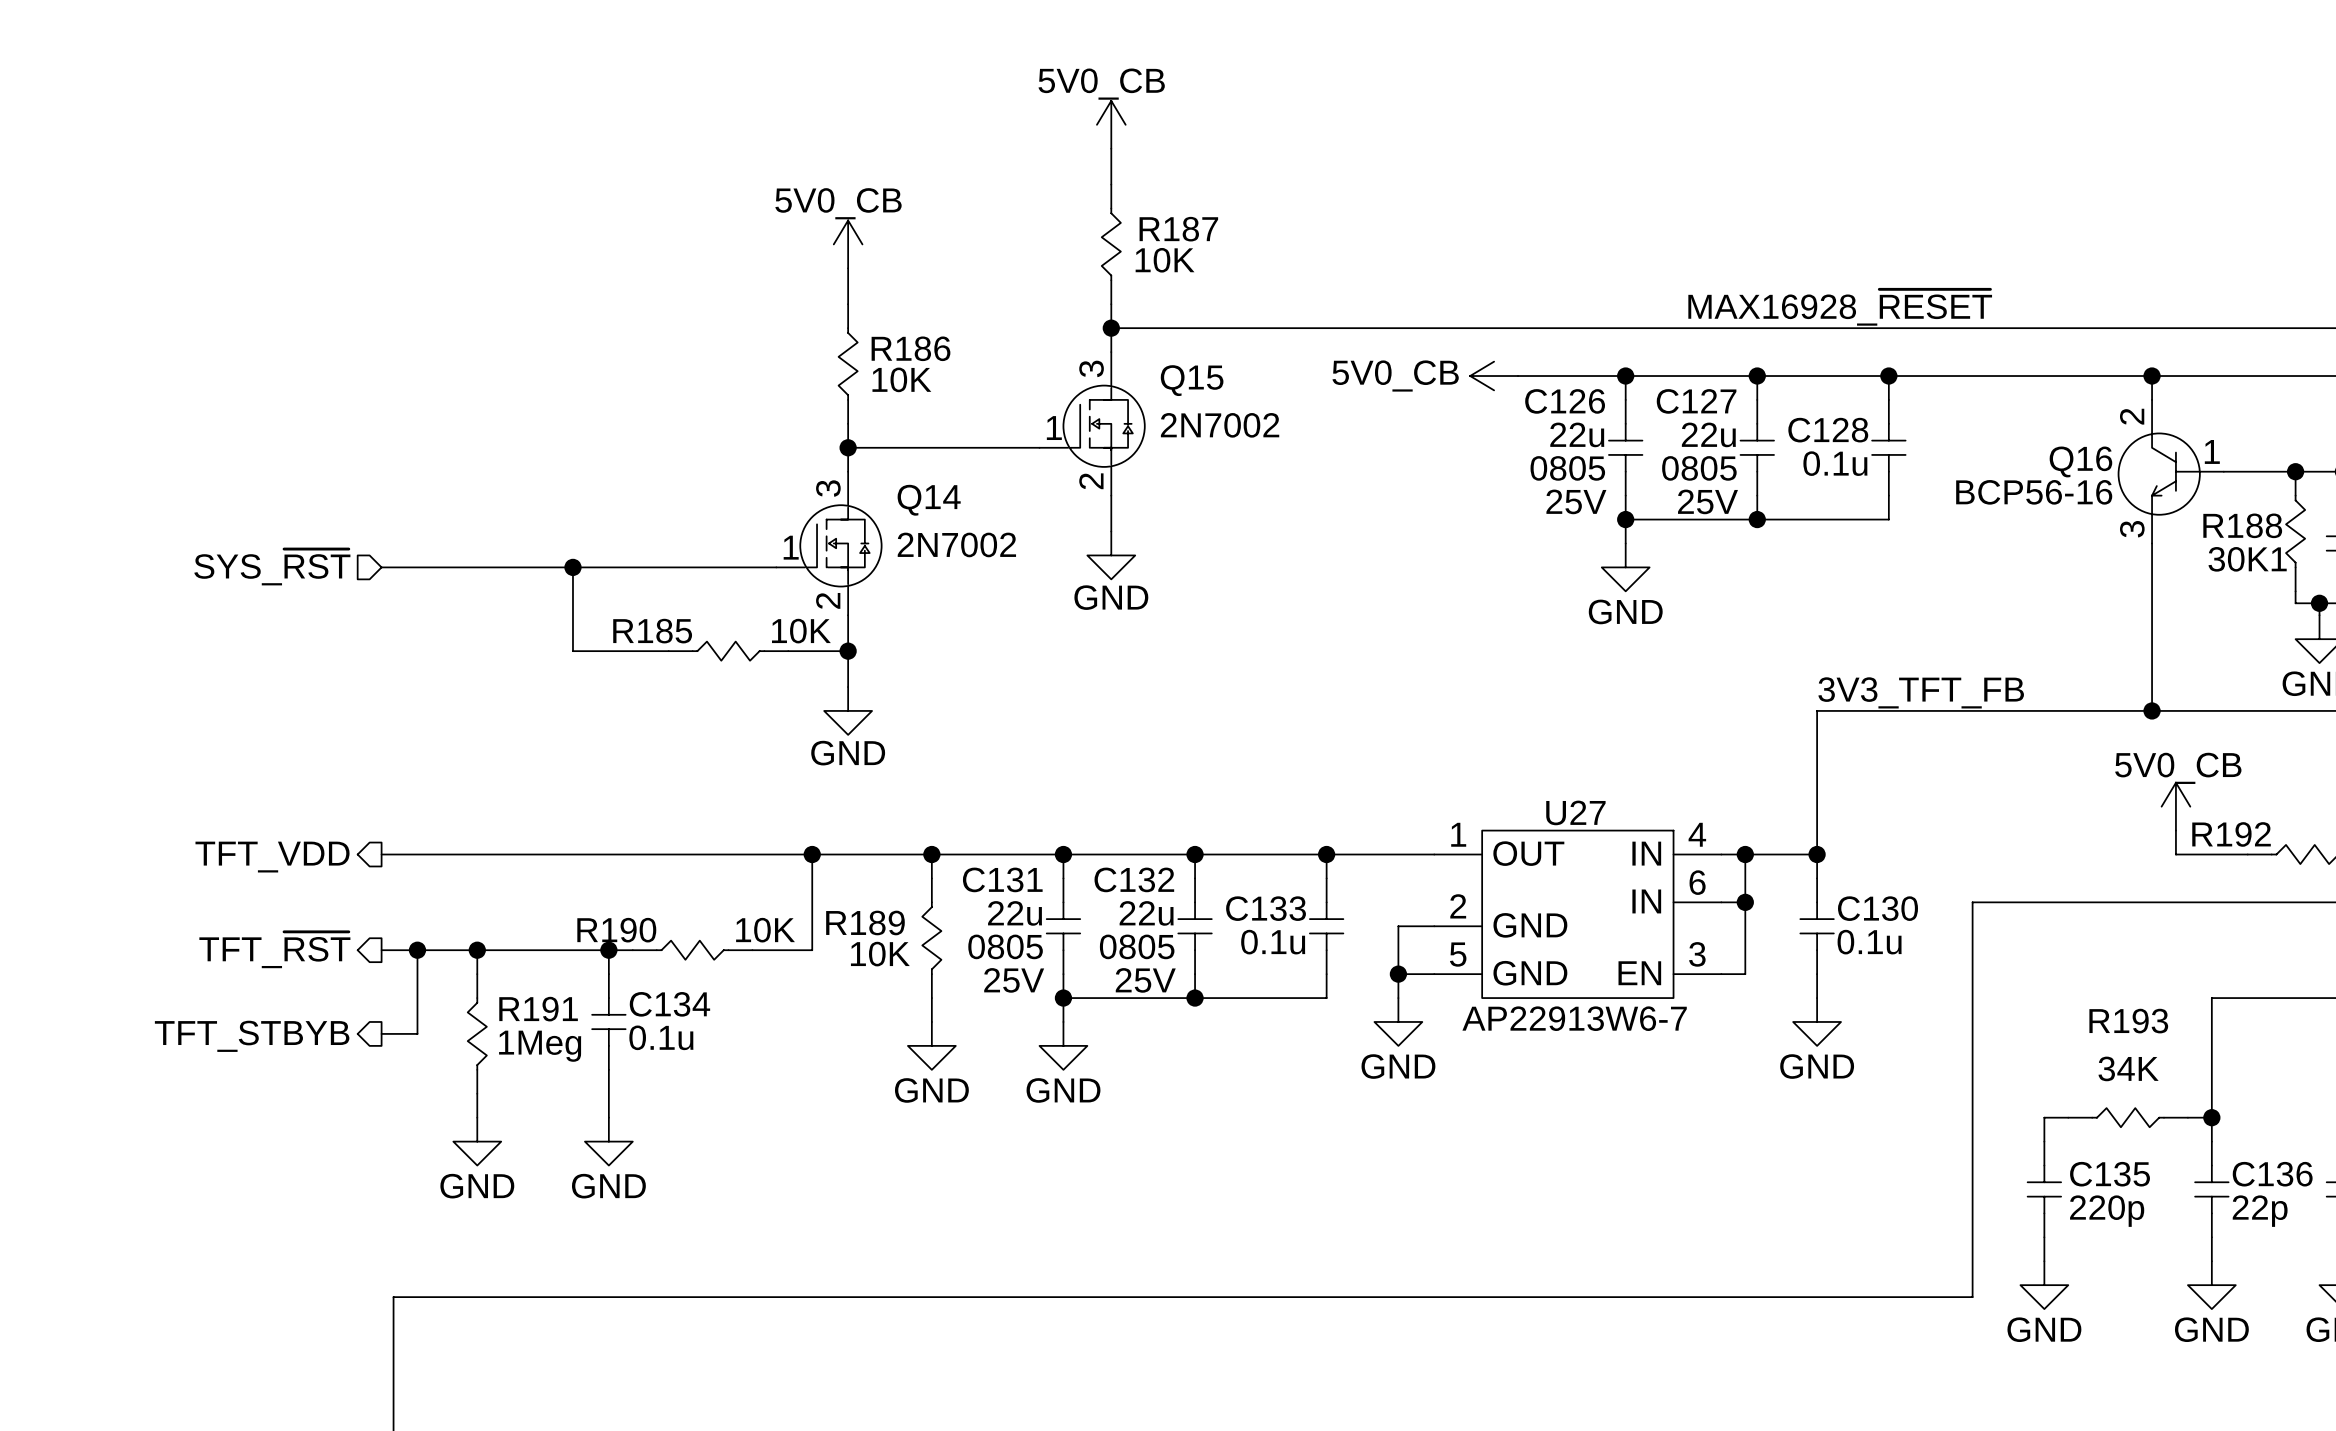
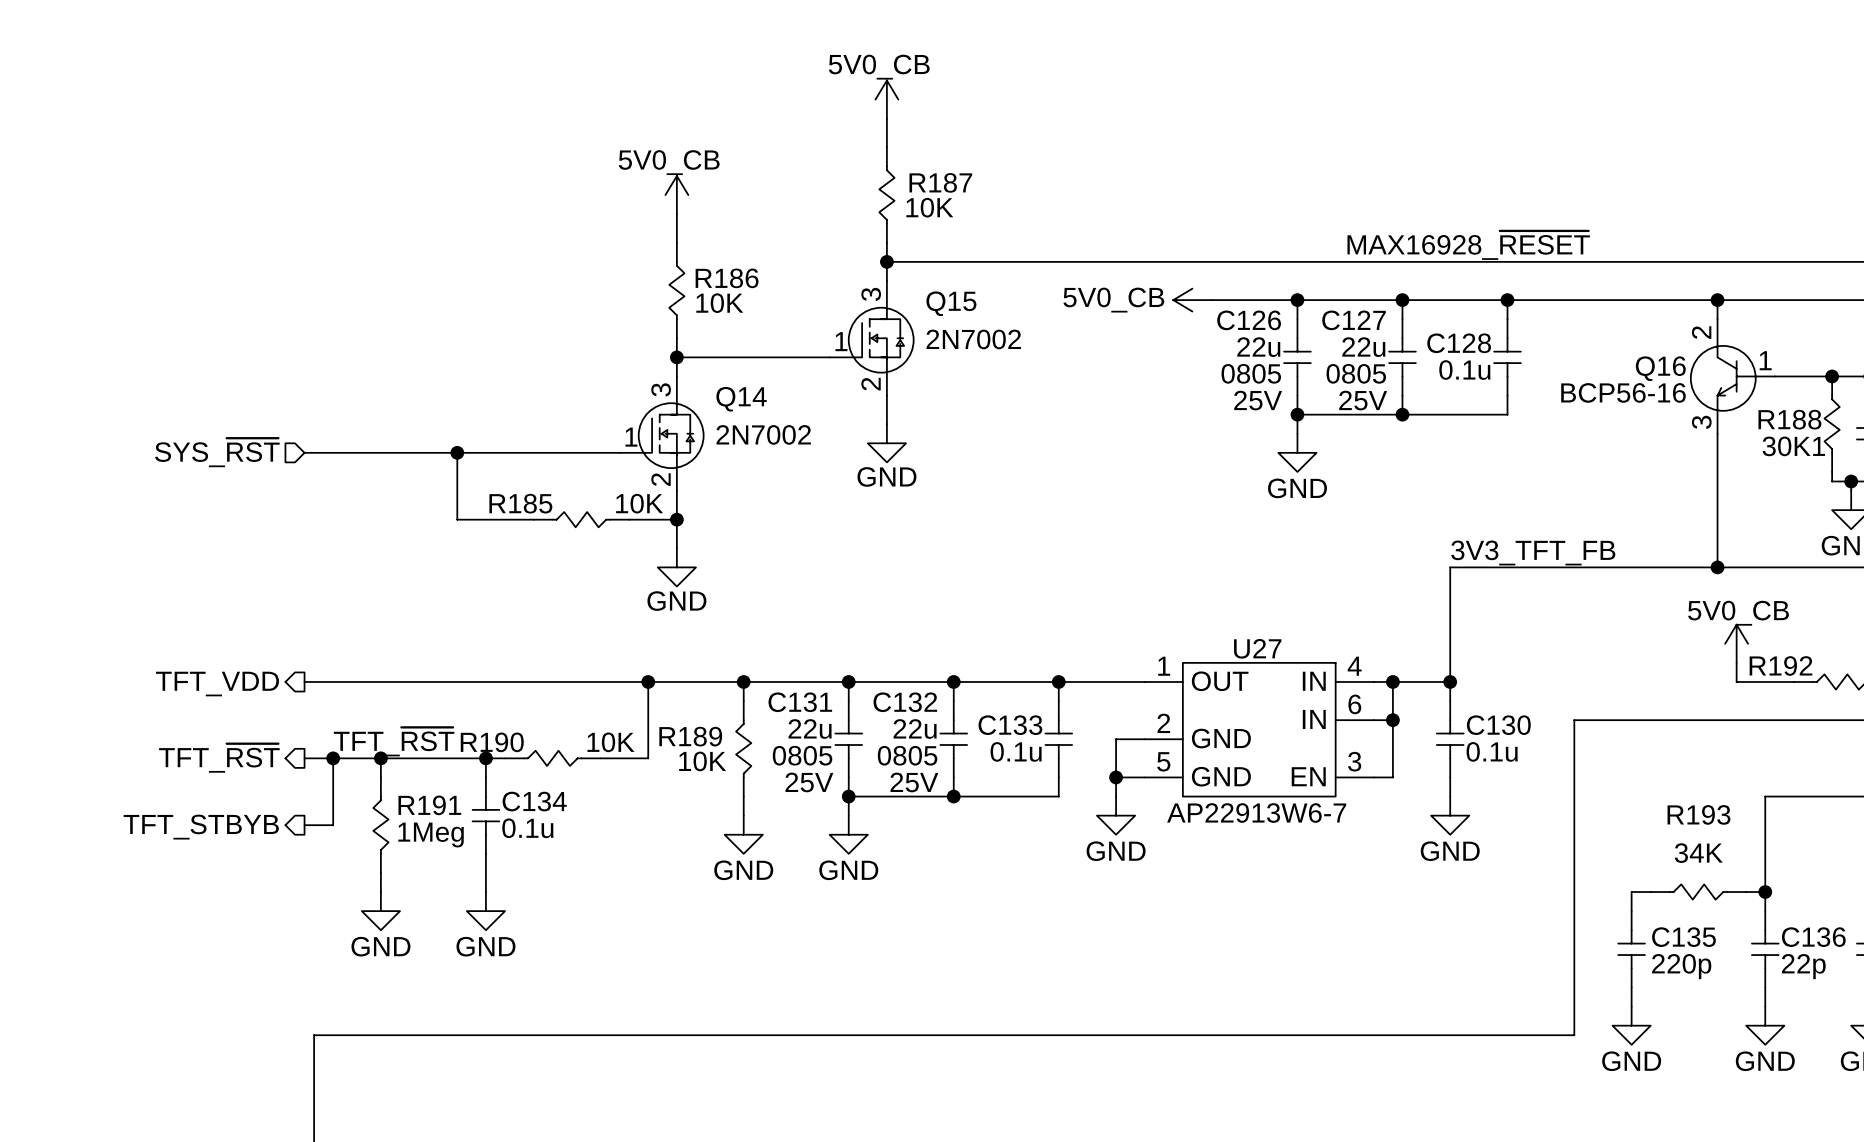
label: none -> TFT_~{RST} (394, 741)

